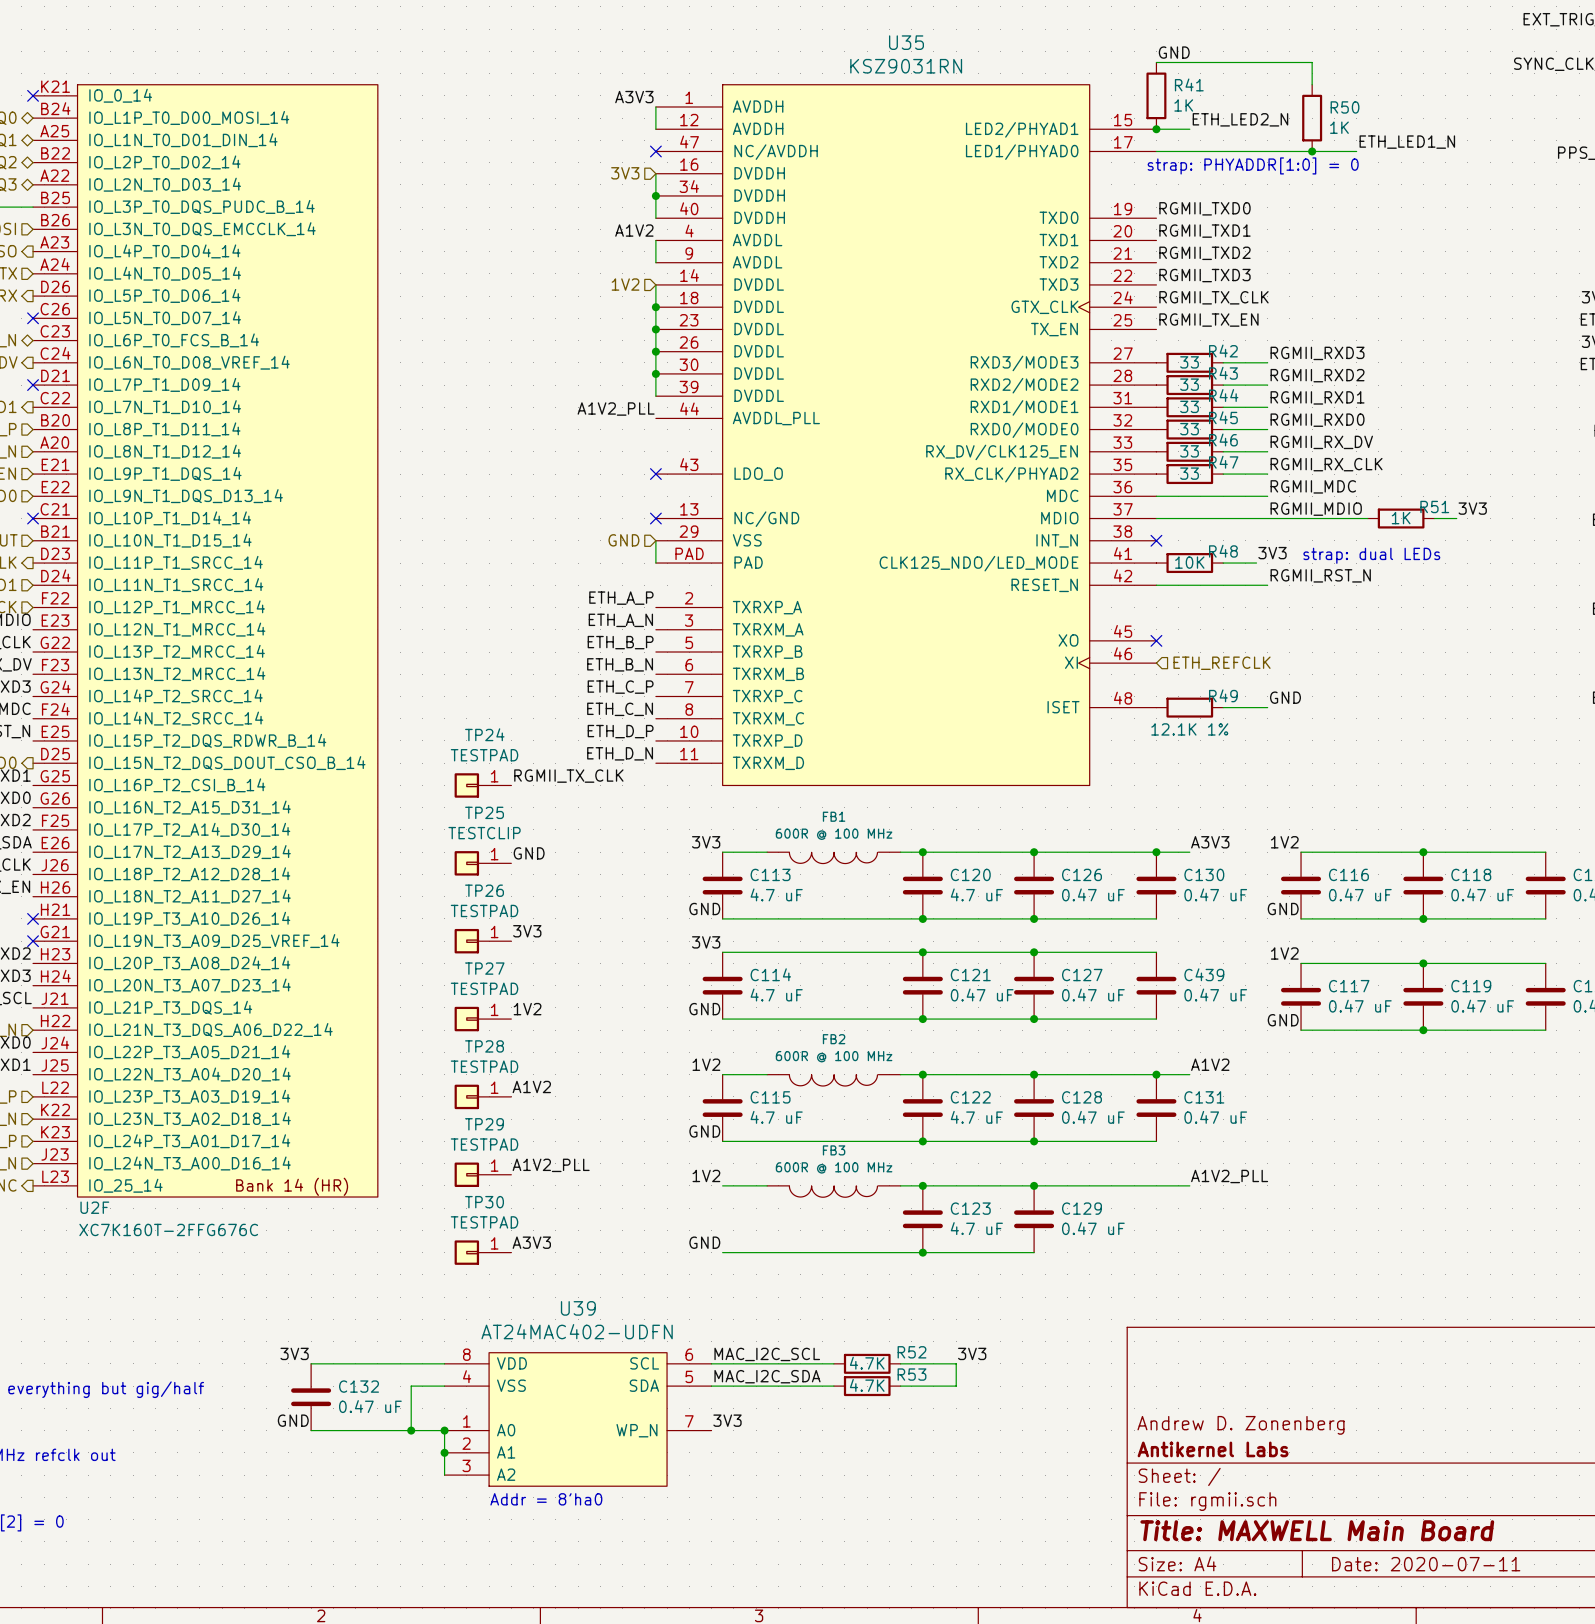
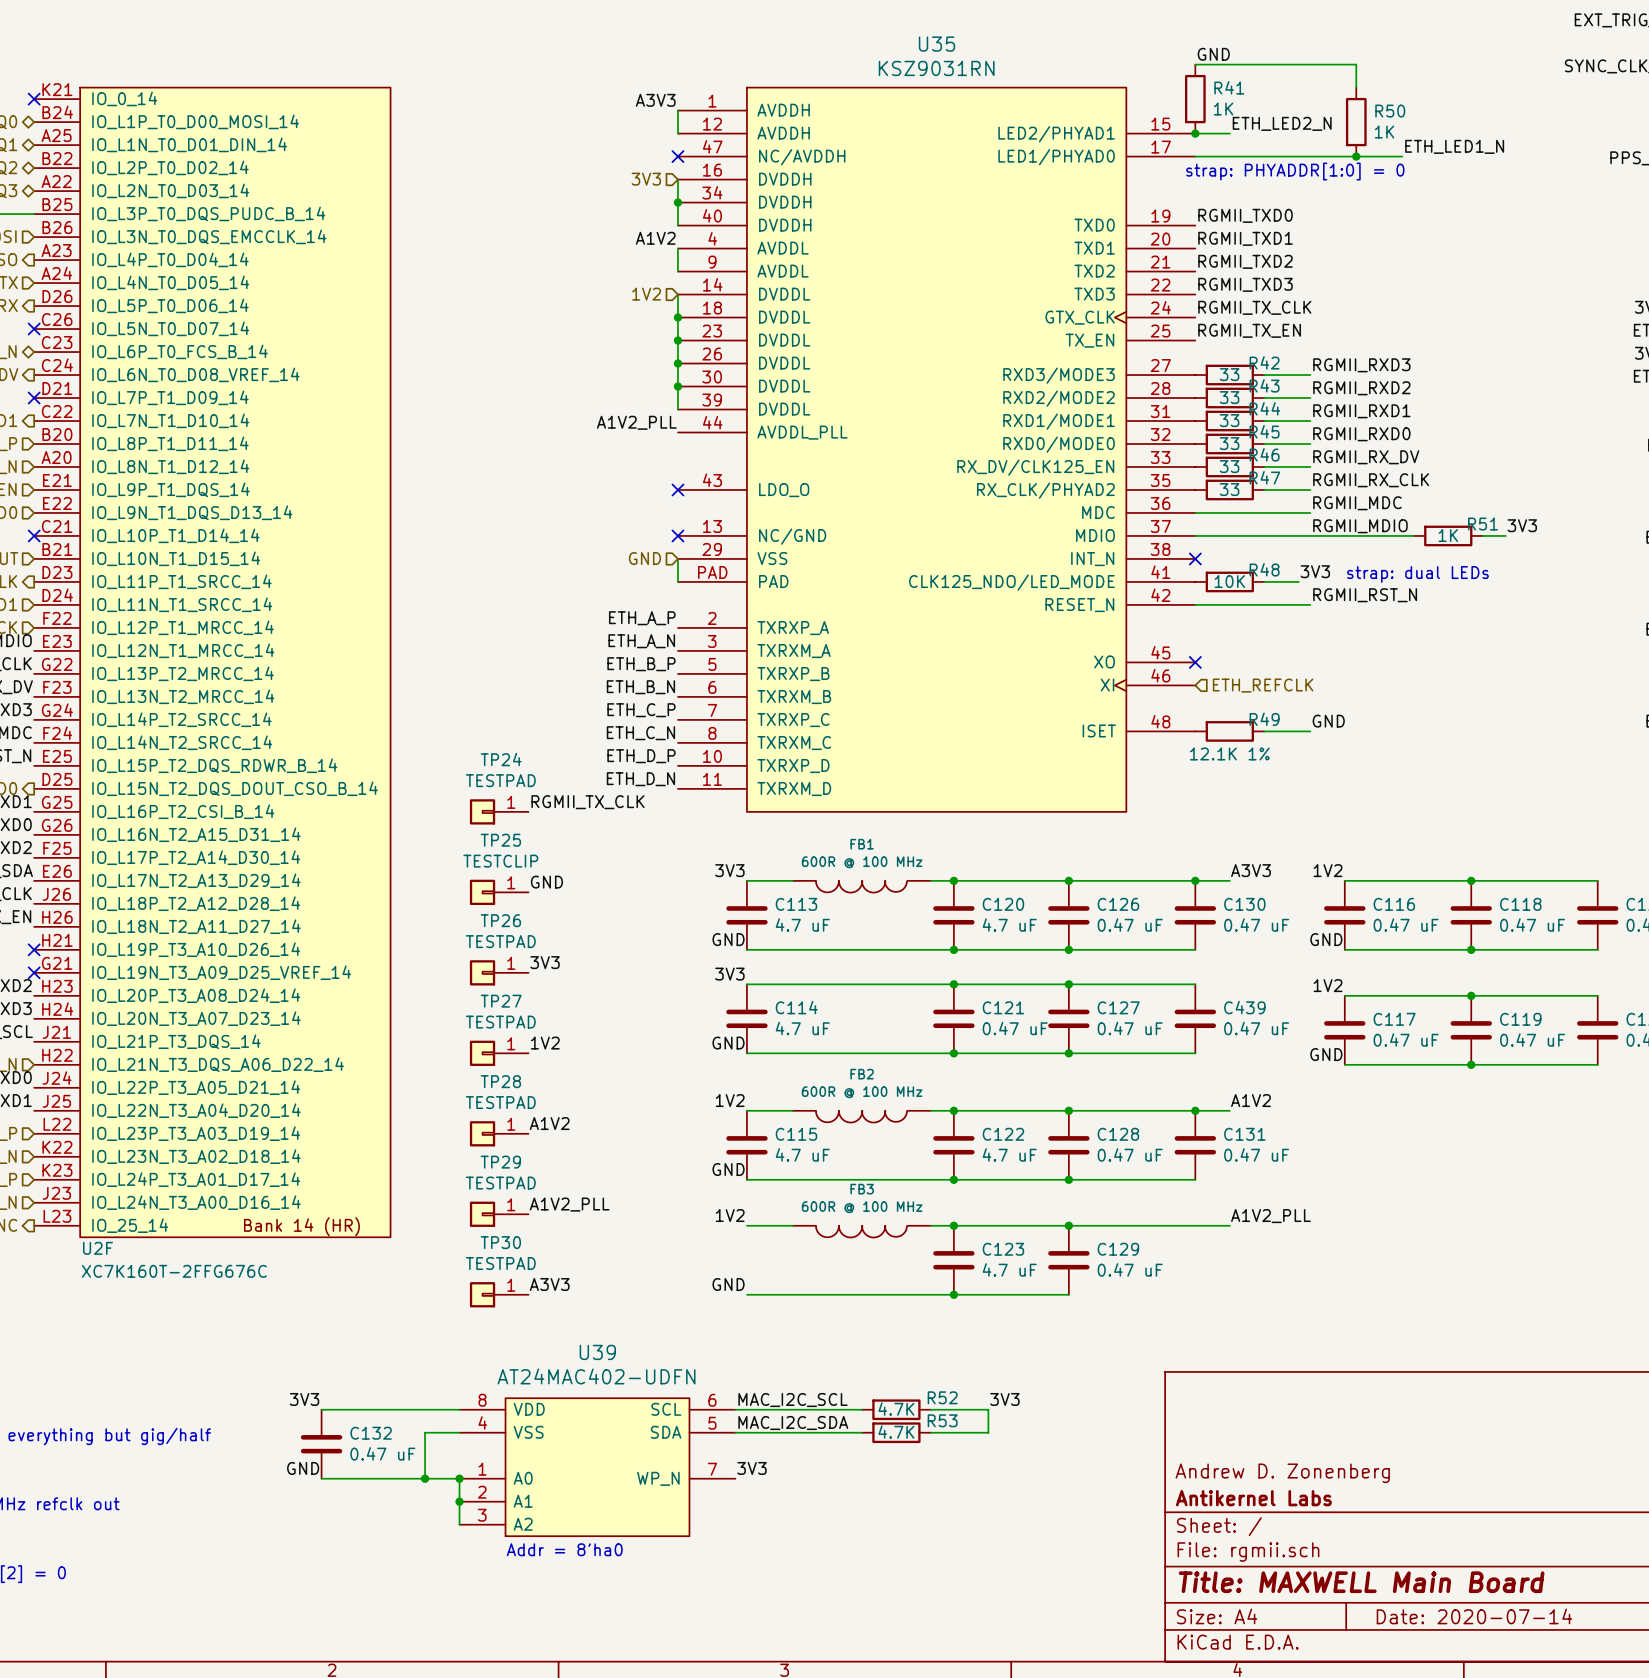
title block: Date: 2020-07-11 (1426, 1564) -> Date: 2020-07-14 (1474, 1616)

